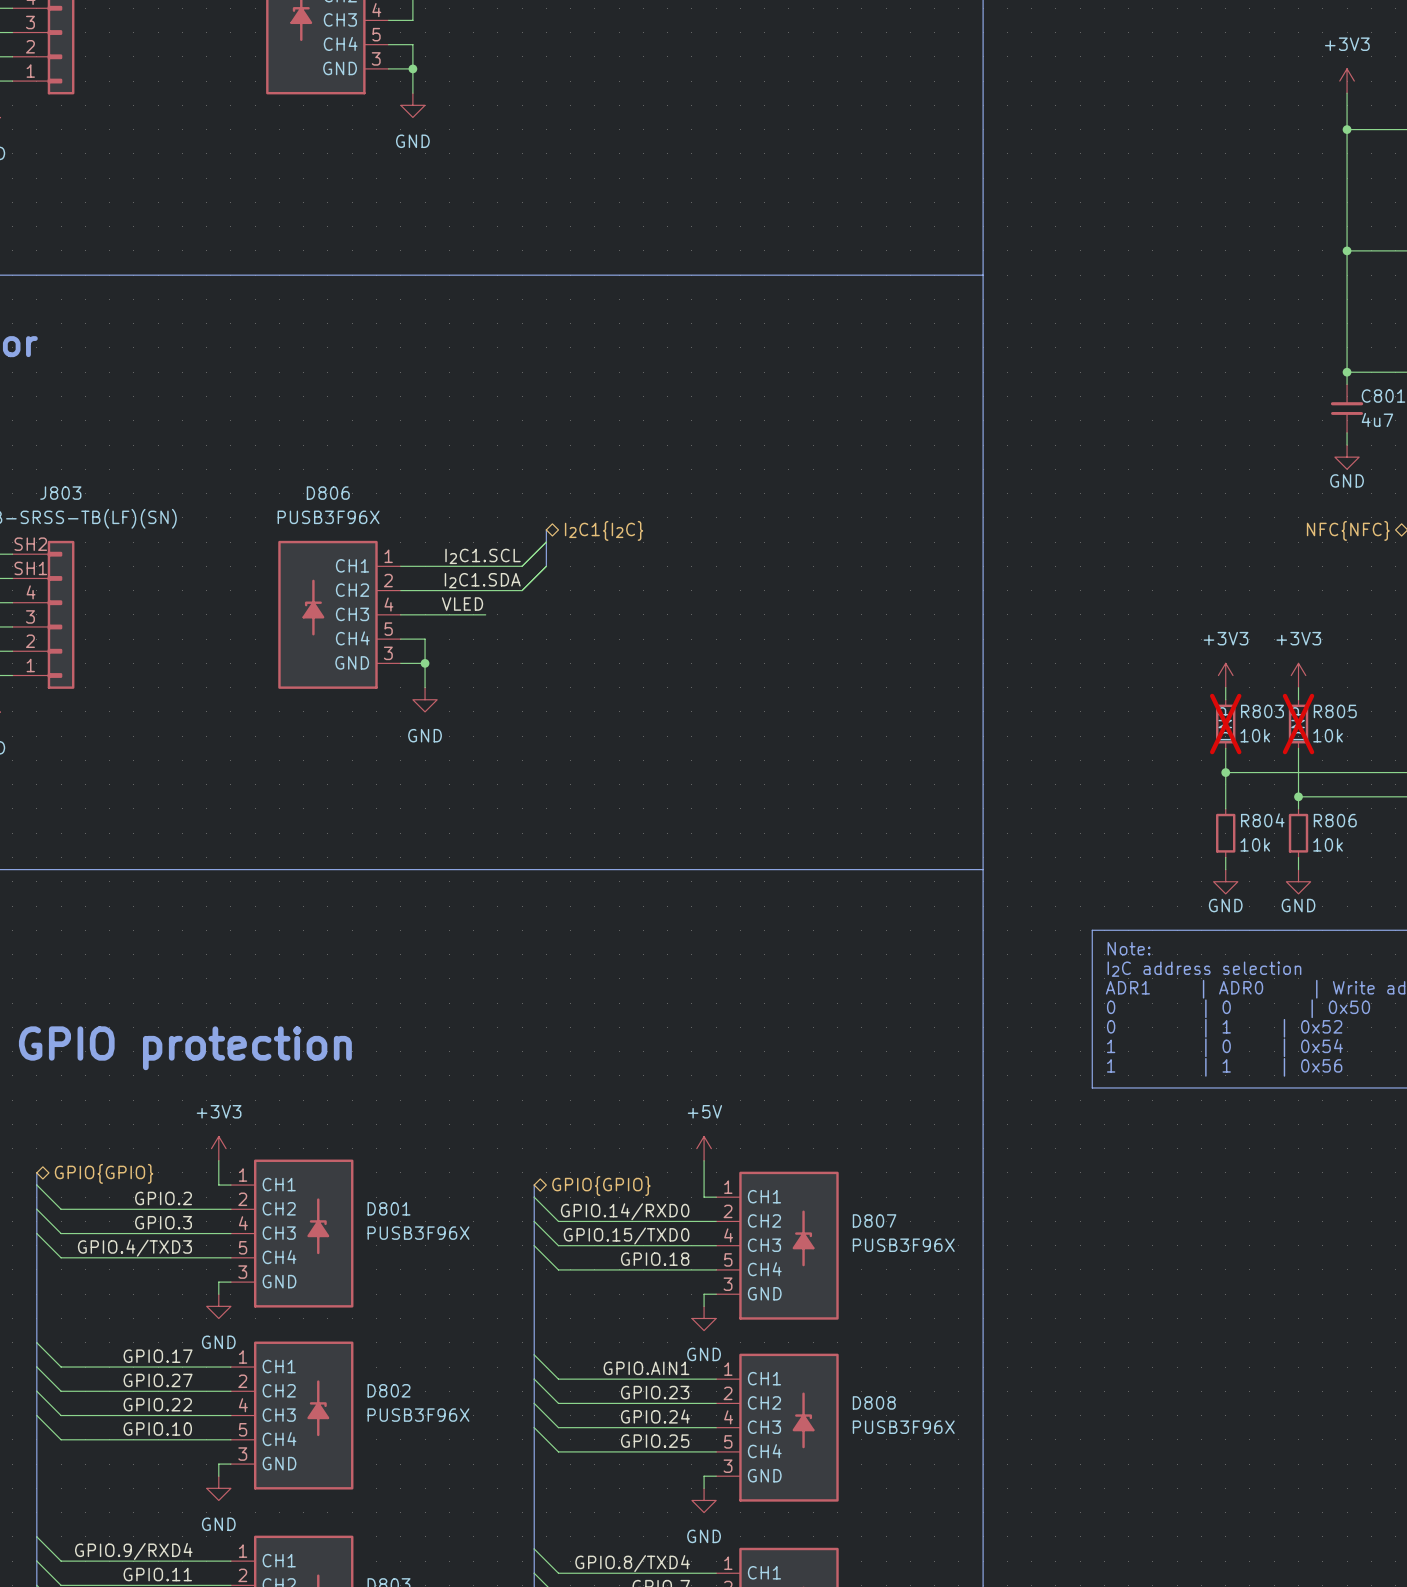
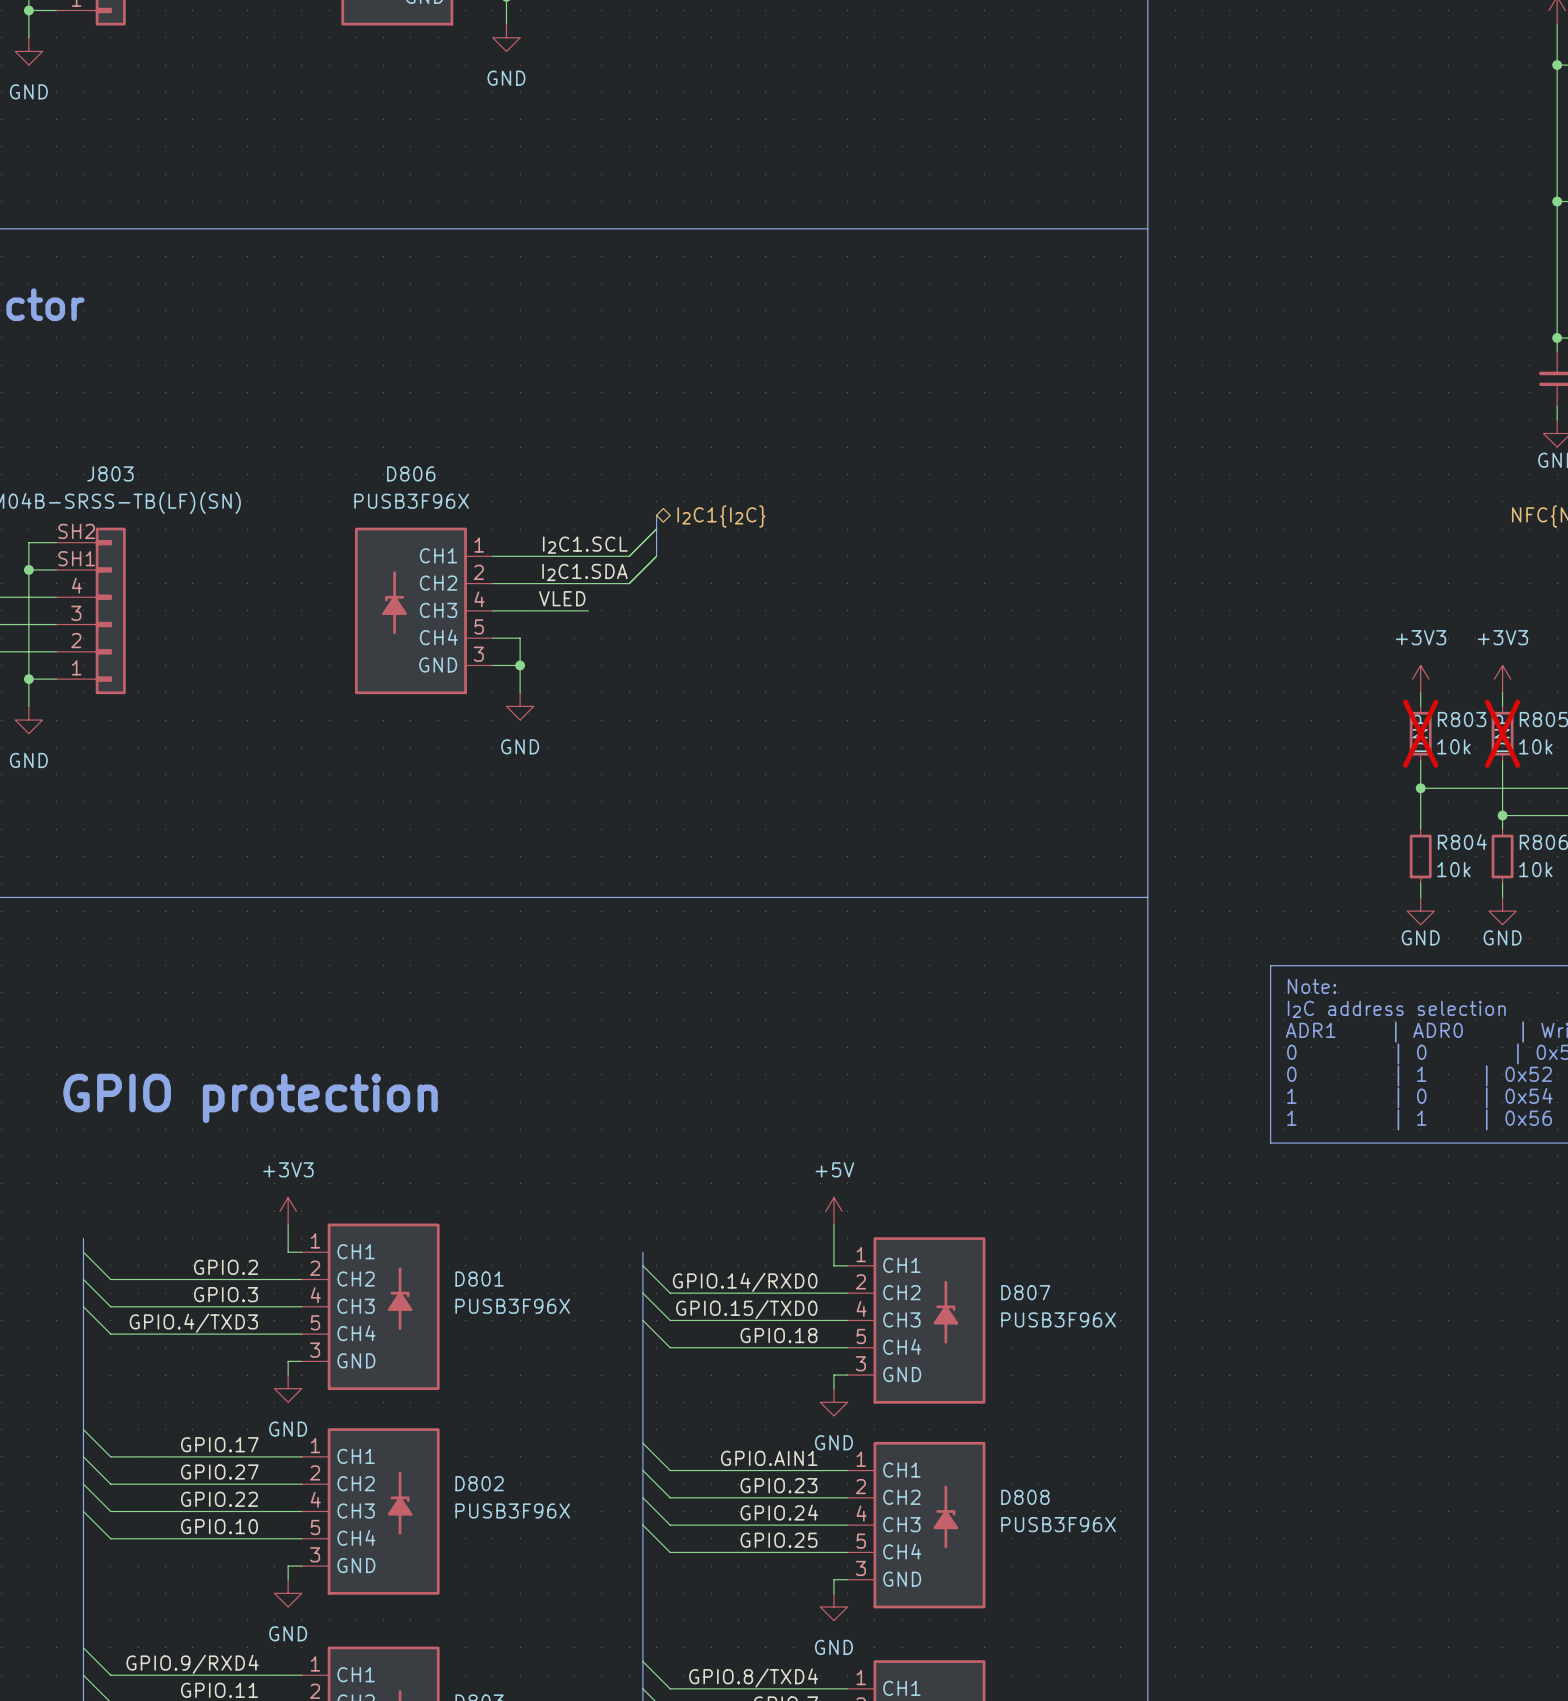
hierarchical label: GPIO{GPIO} (104, 1173) -> none
hierarchical label: GPIO{GPIO} (601, 1186) -> none

